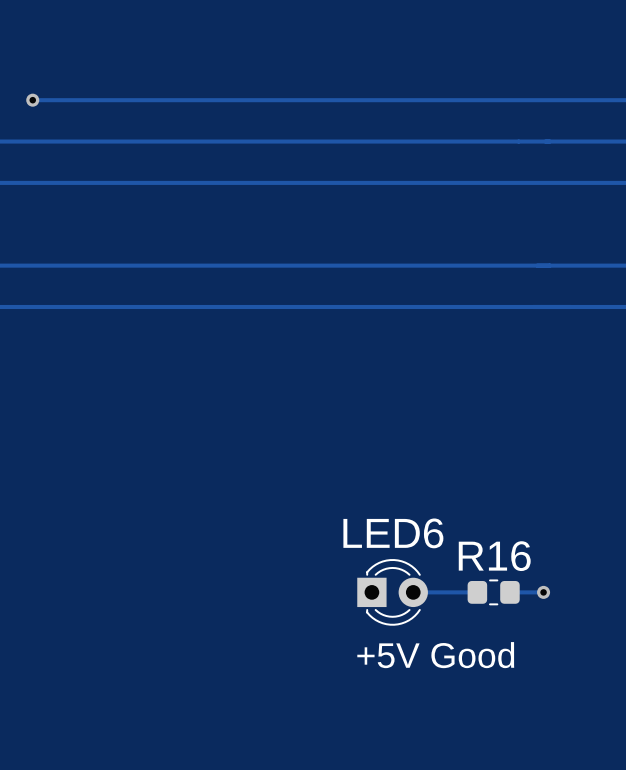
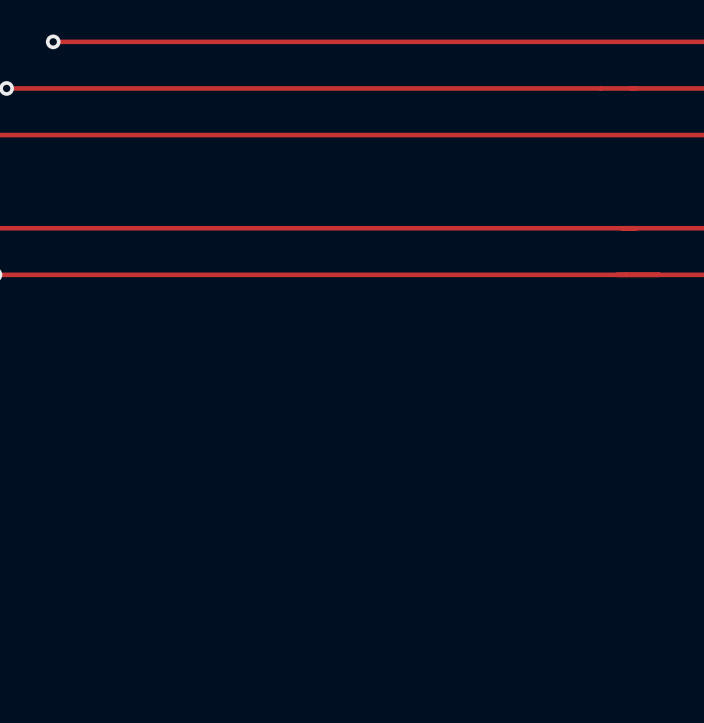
LED6: (392, 592) -> none
track: (413, 592) (477, 592) -> none
R16: (493, 592) -> none
track: (509, 592) (543, 592) -> none
via: (543, 592) -> none
text: +5V Good (435, 655) -> none

